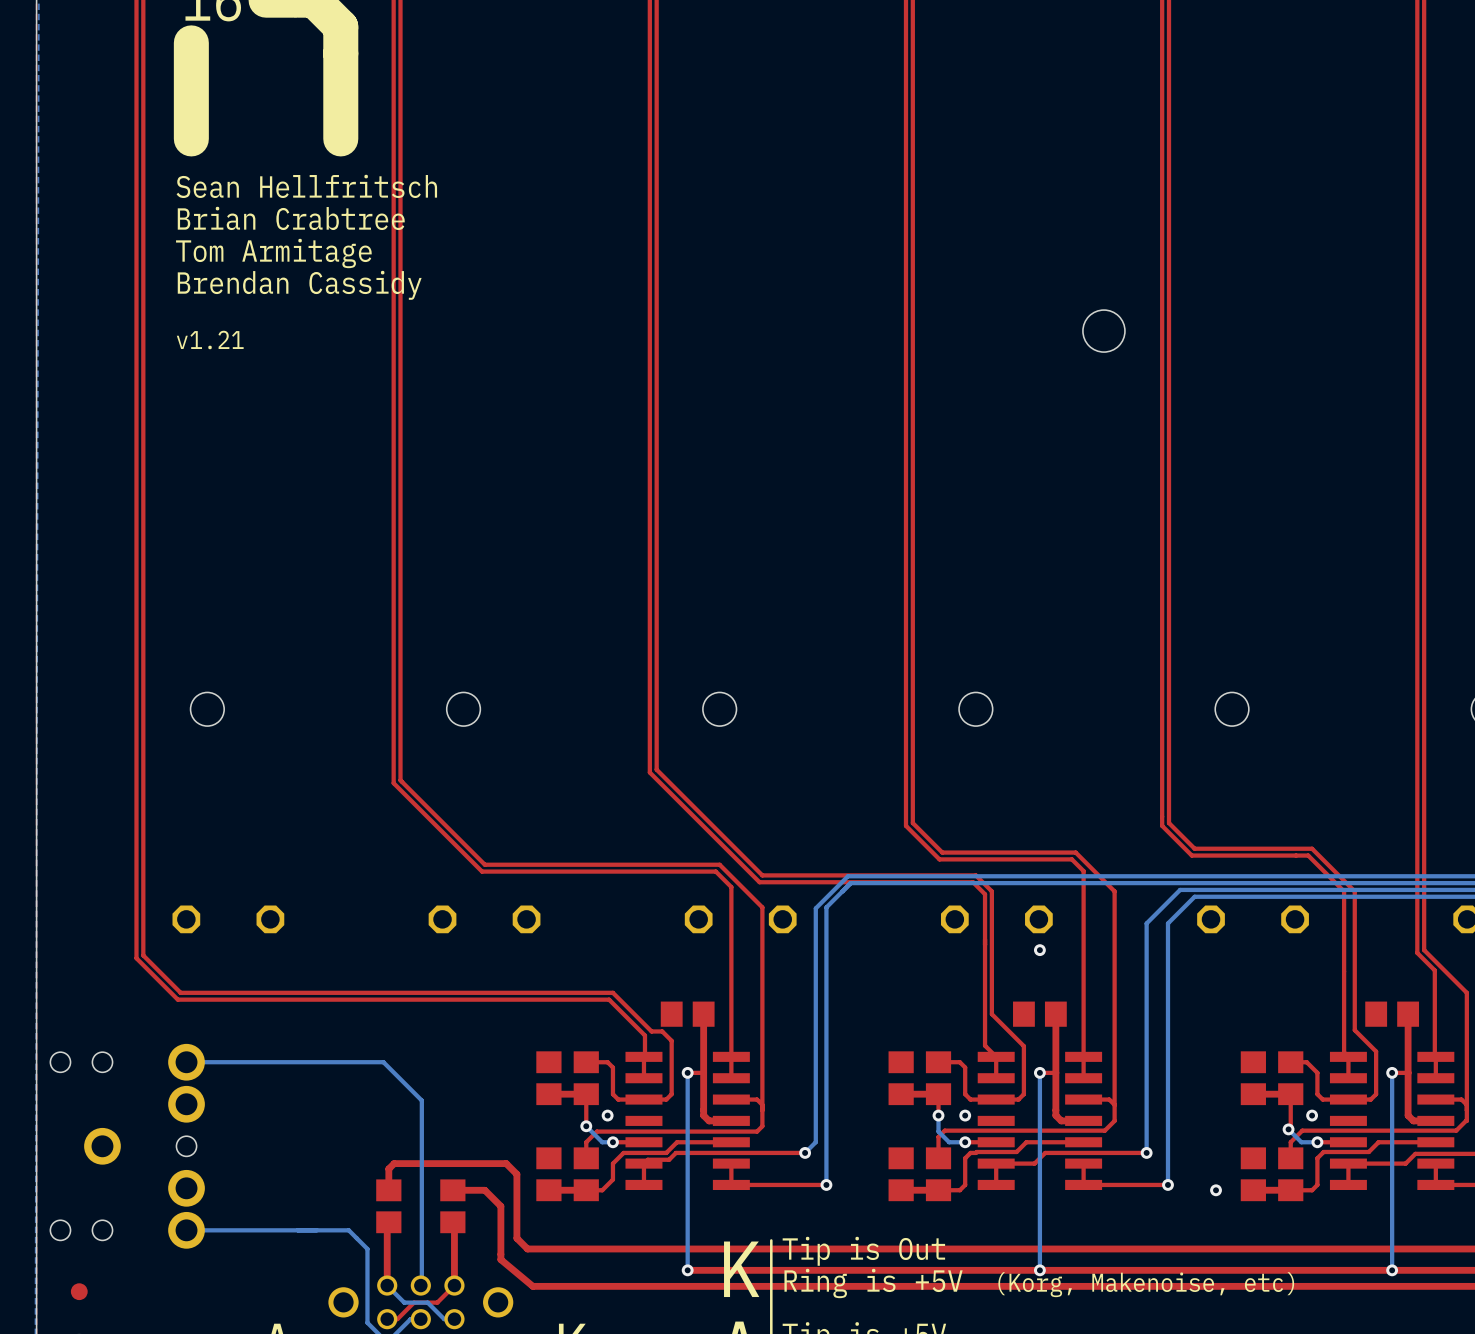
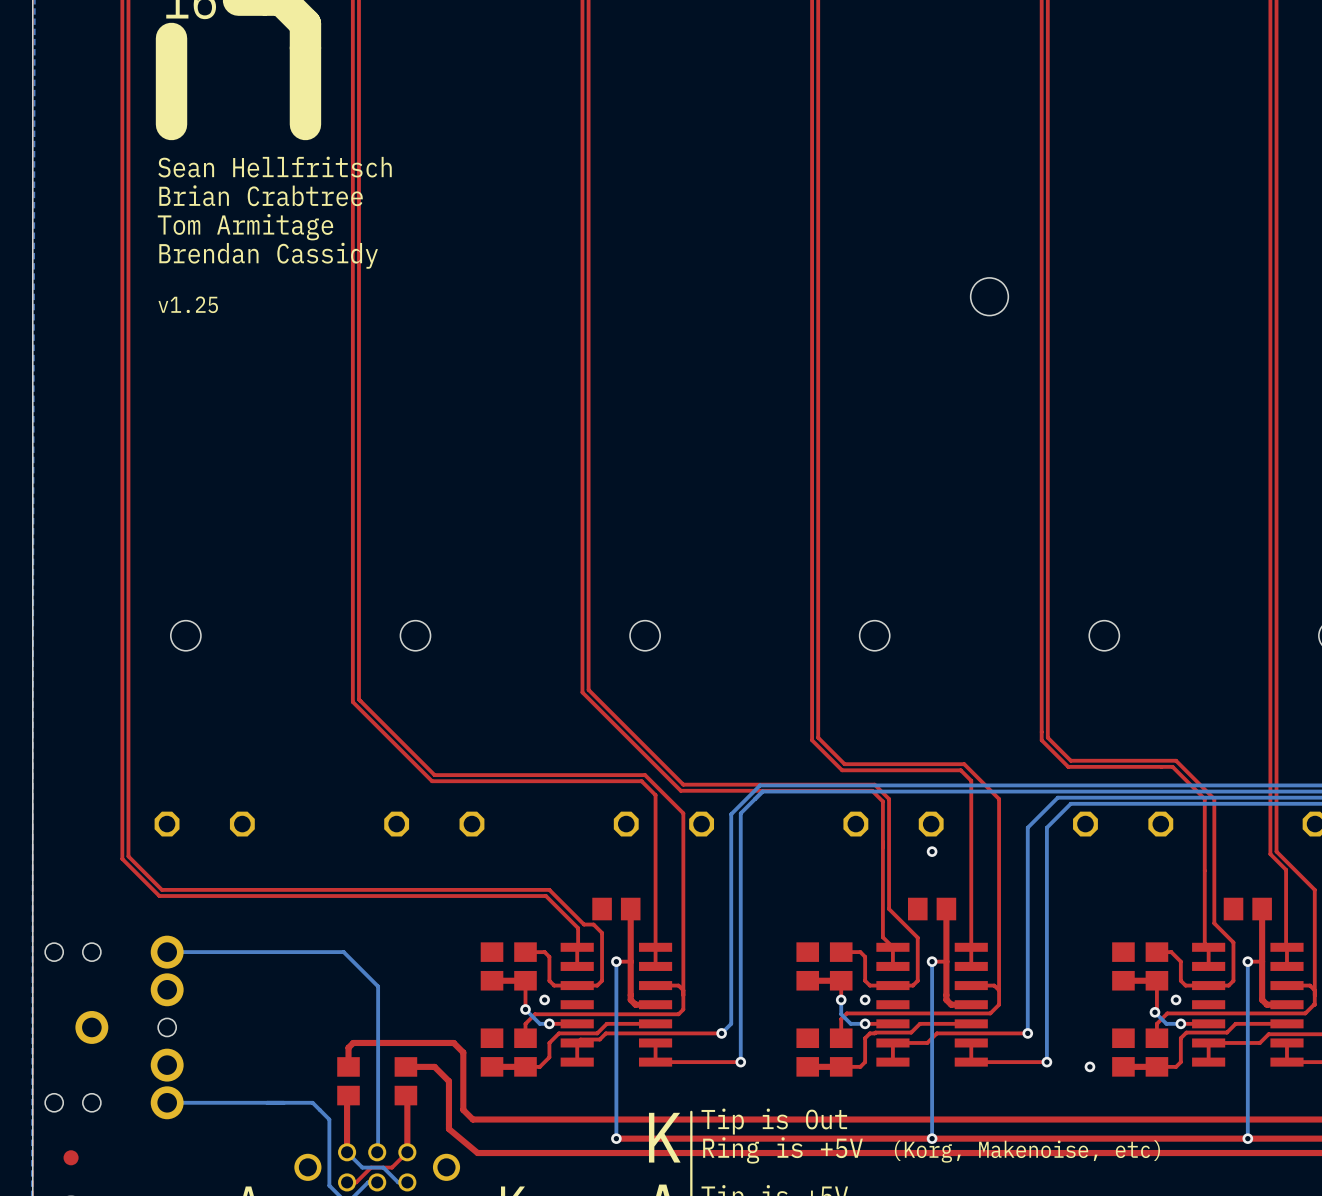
text: v1.21 (210, 339) -> v1.25 (188, 304)

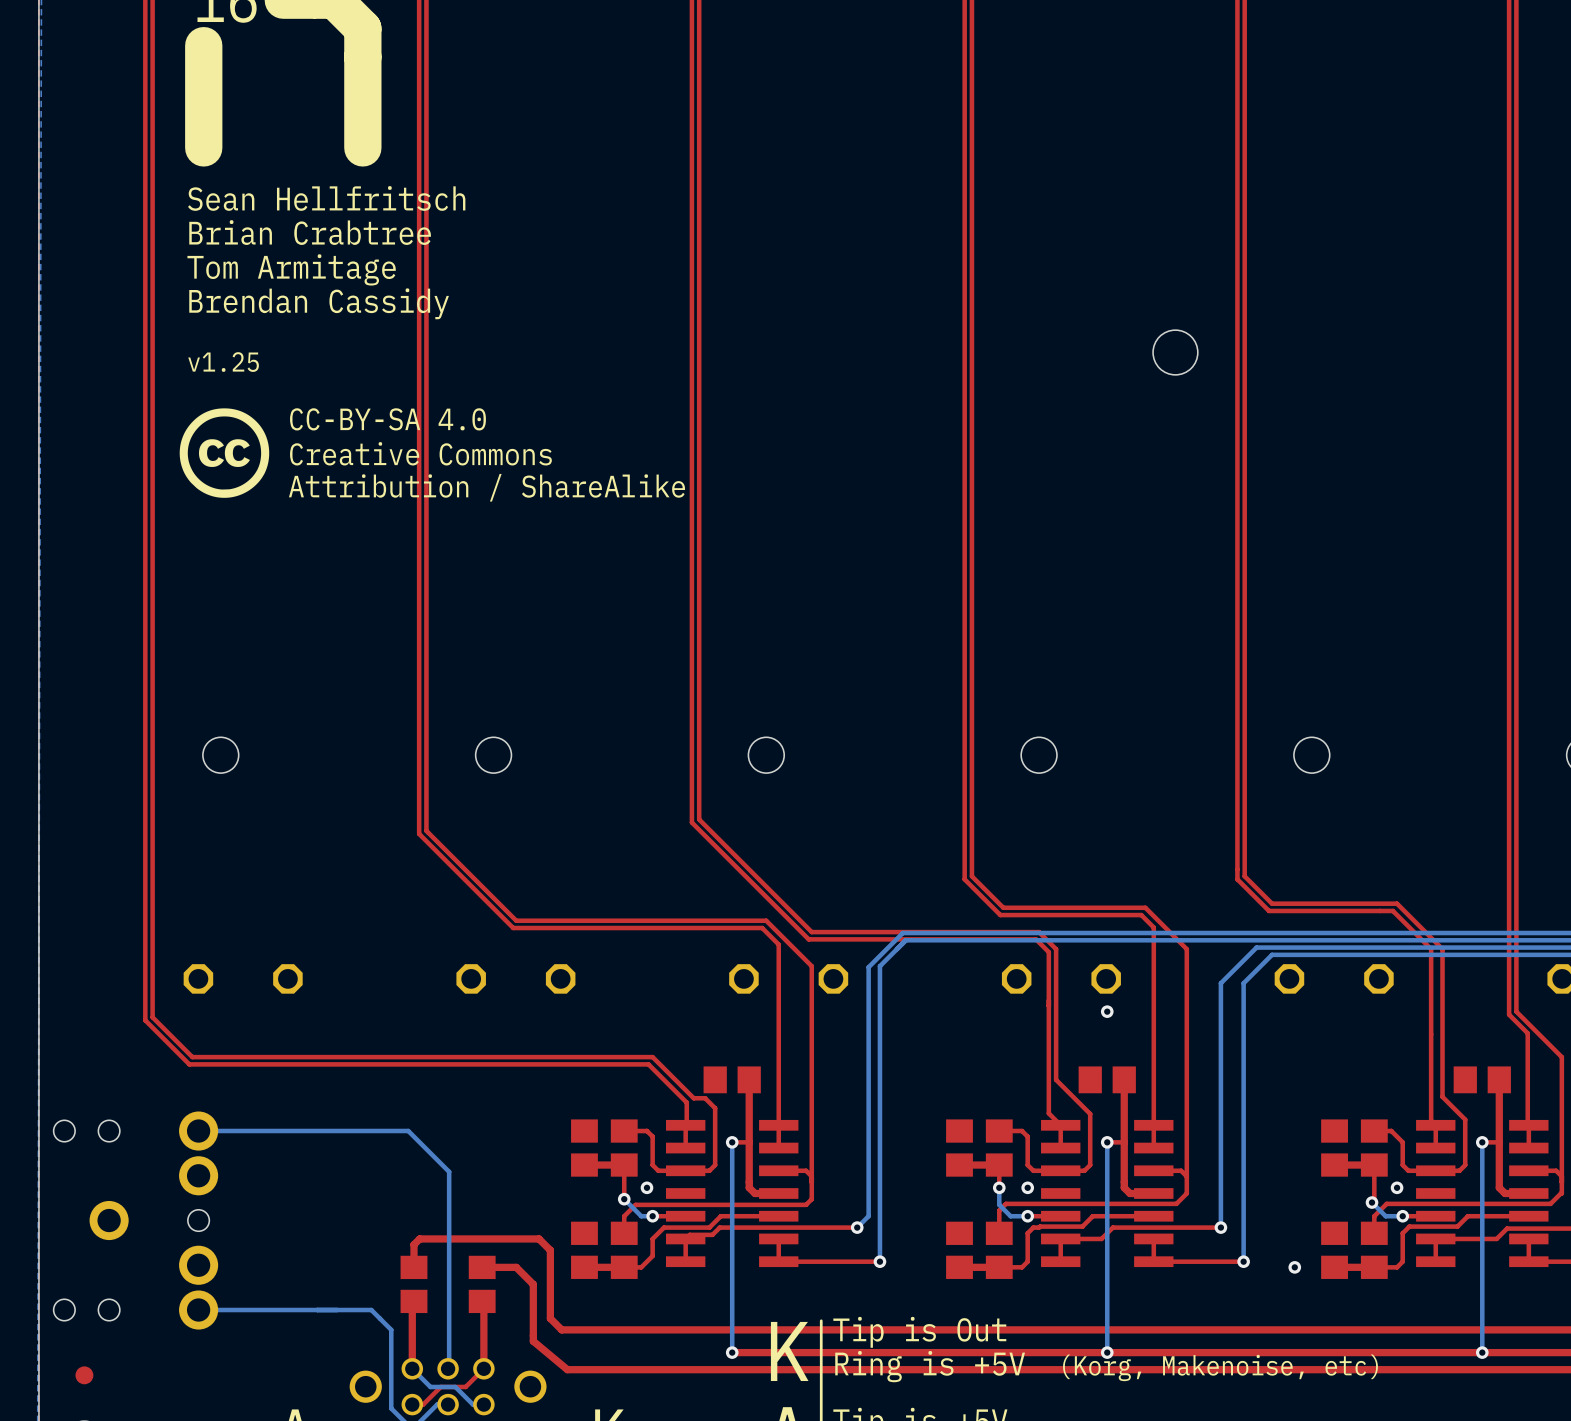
drawing: none -> [179, 408, 270, 498]
text: none -> CC-BY-SA 4.0 (387, 419)
text: none -> Creative Commons (420, 453)
text: none -> Attribution / ShareAlike (486, 487)

